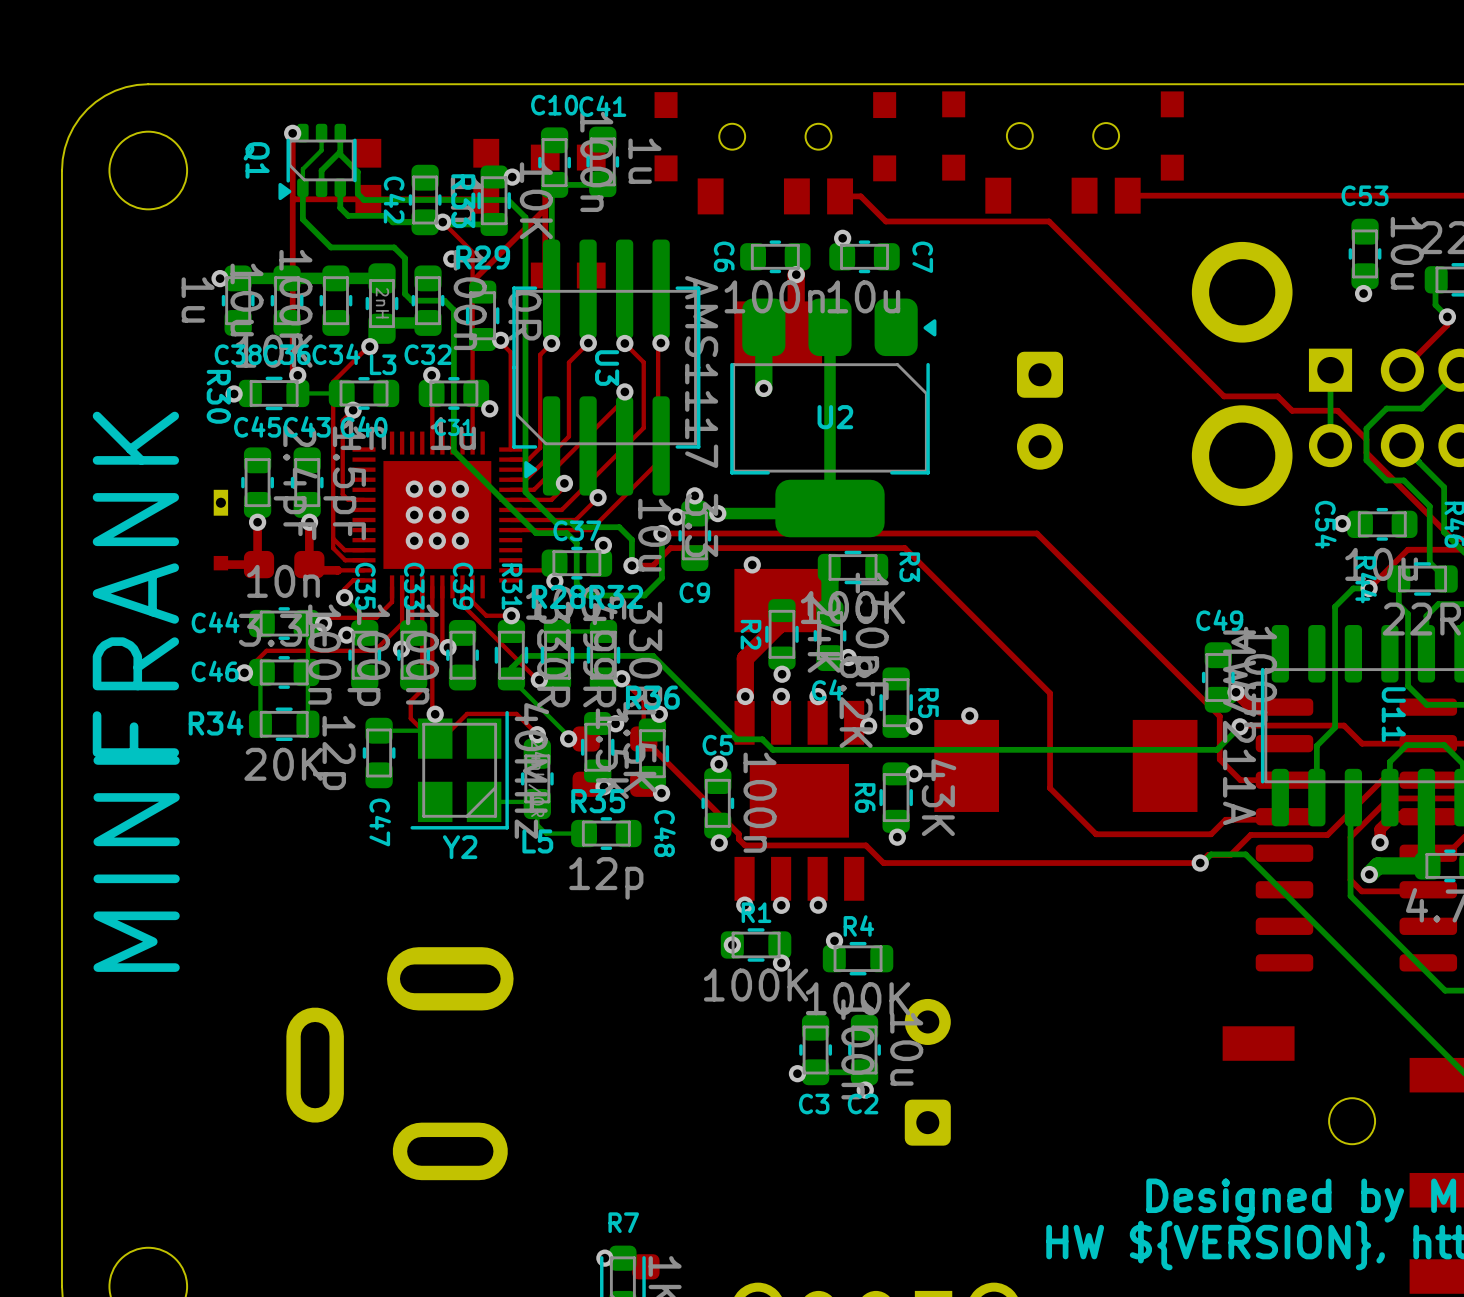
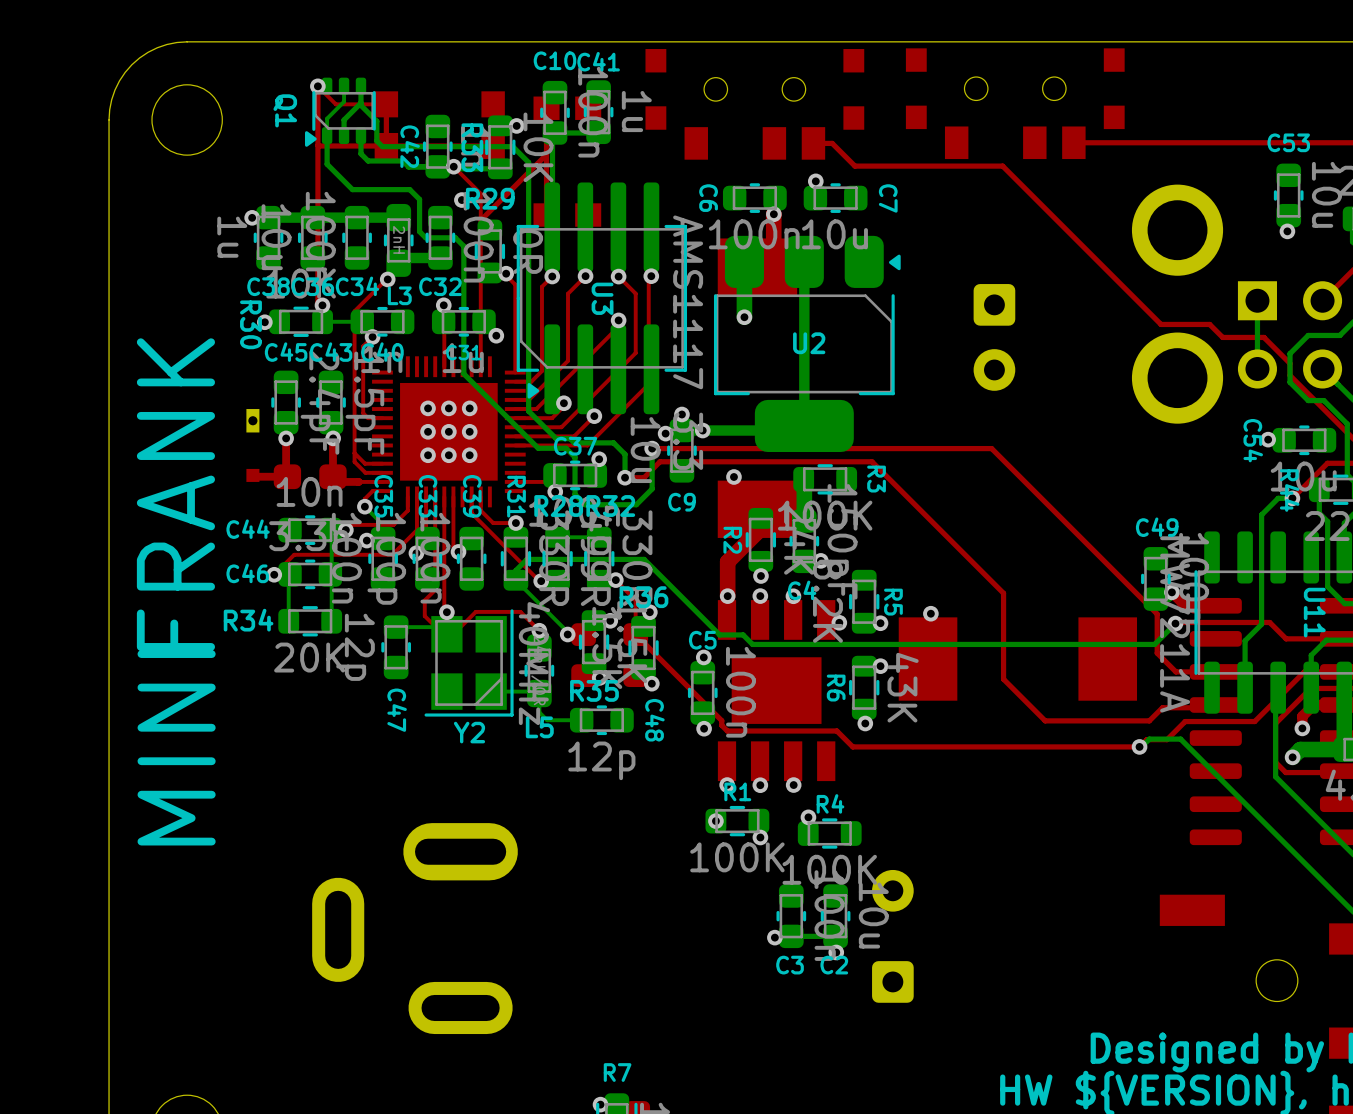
top track: none -> (317, 86) (335, 104) (386, 104) (386, 146)

